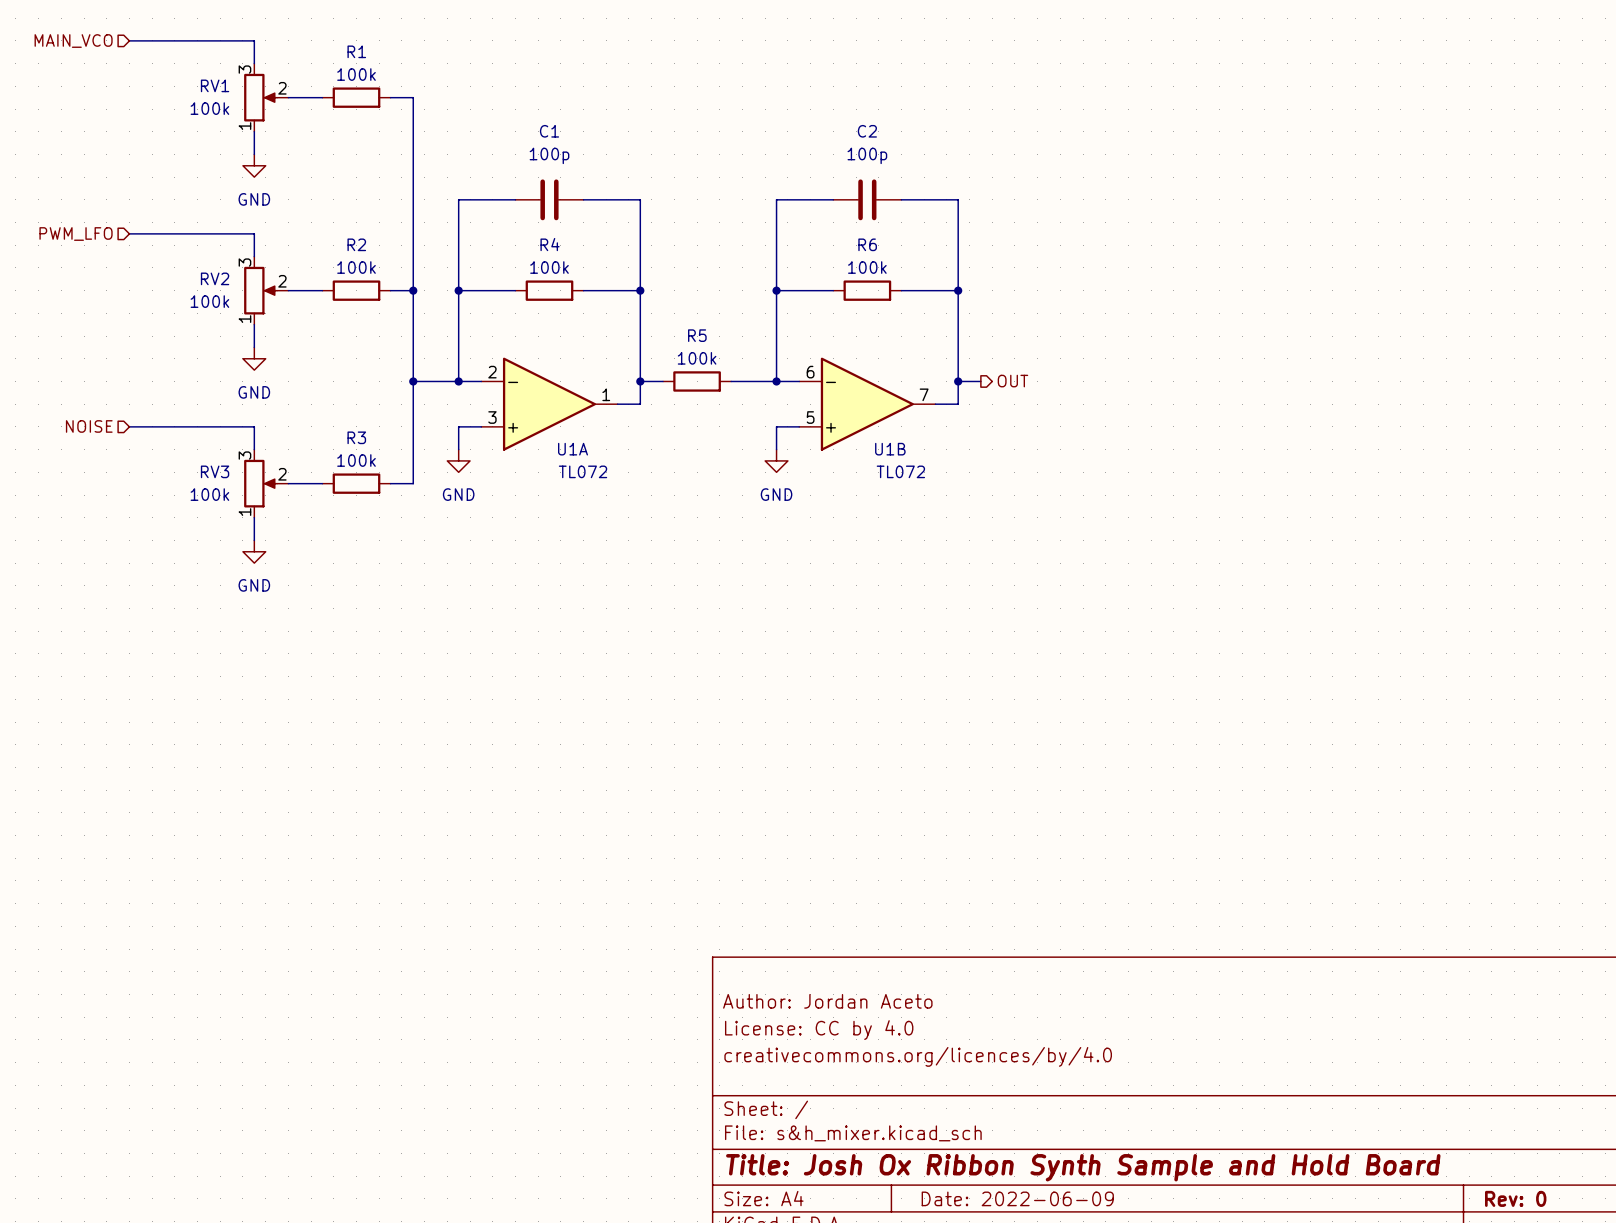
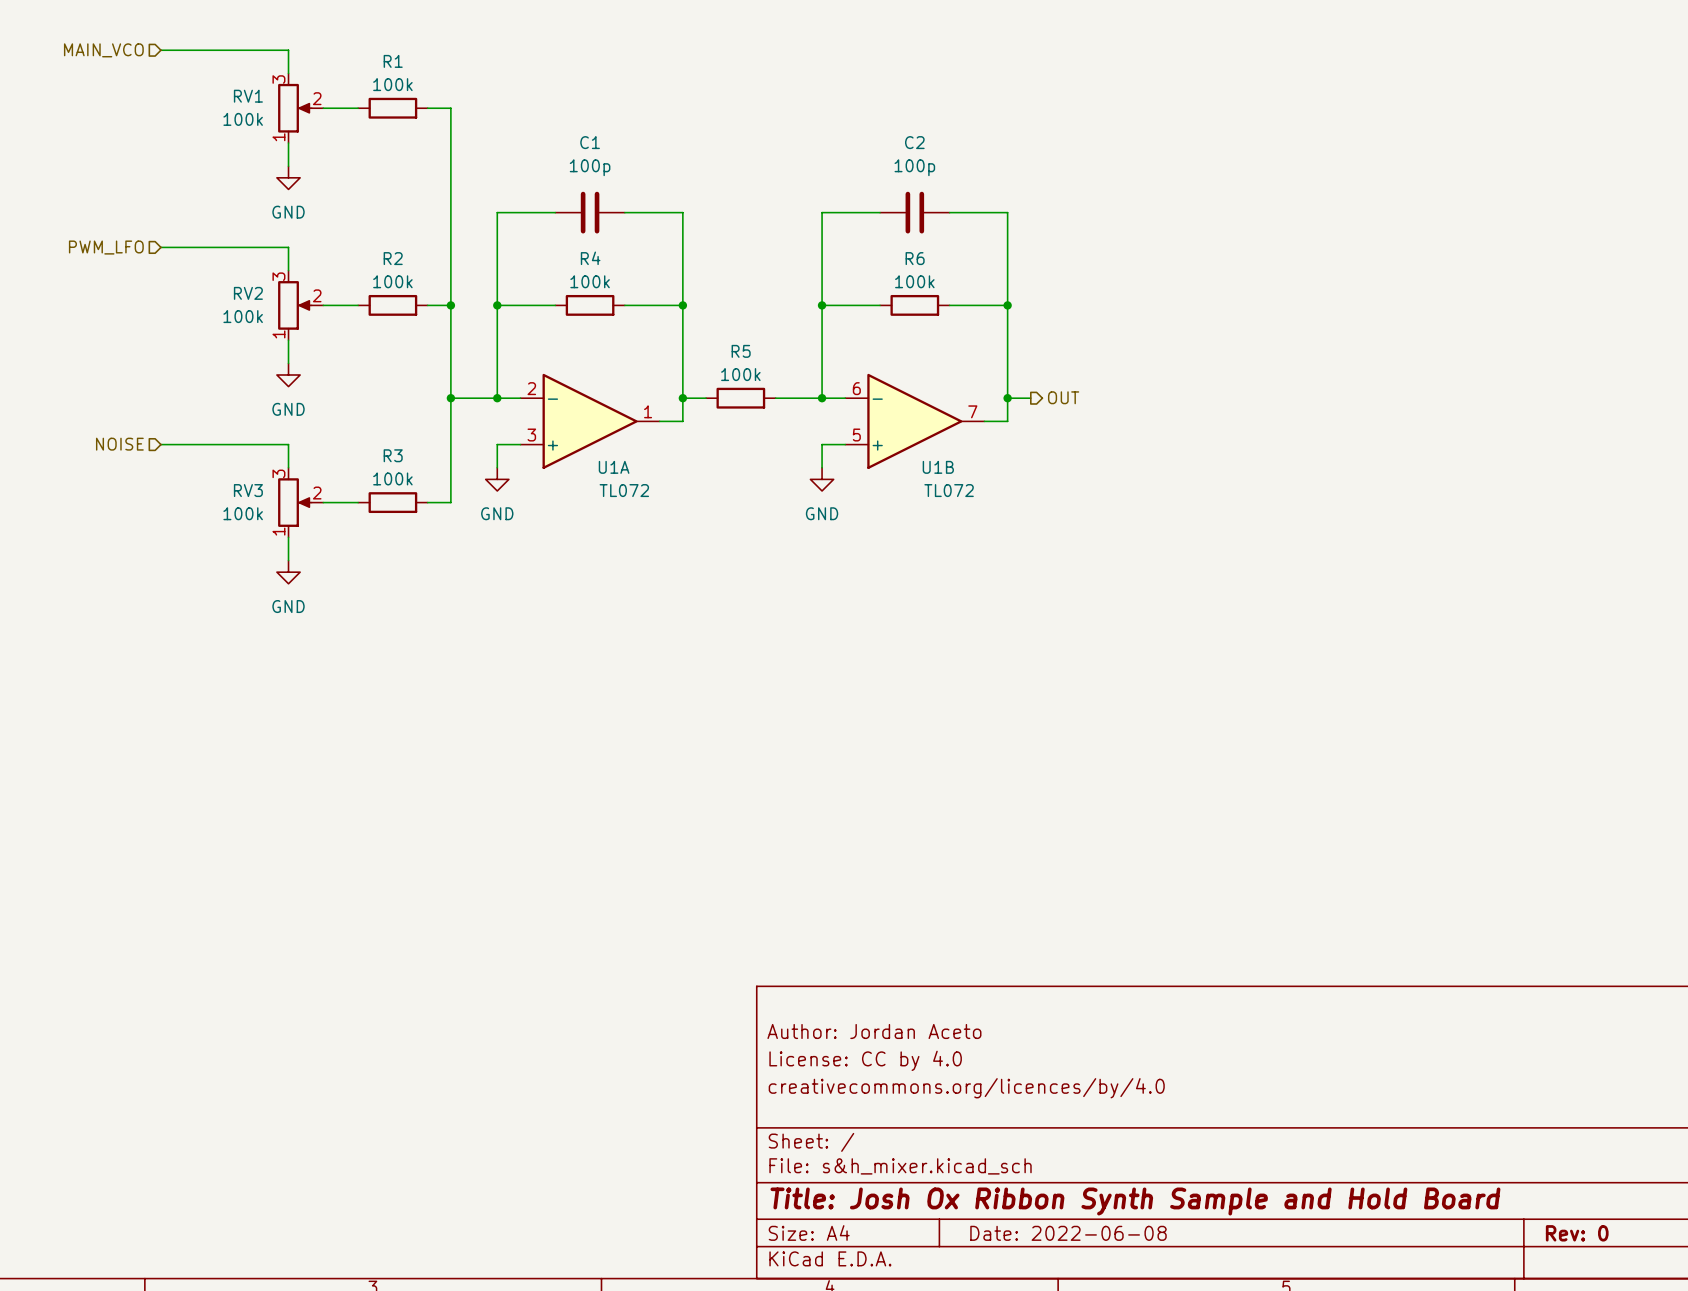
title block: Date: 2022-06-09 (1017, 1198) -> Date: 2022-06-08 (1068, 1233)

